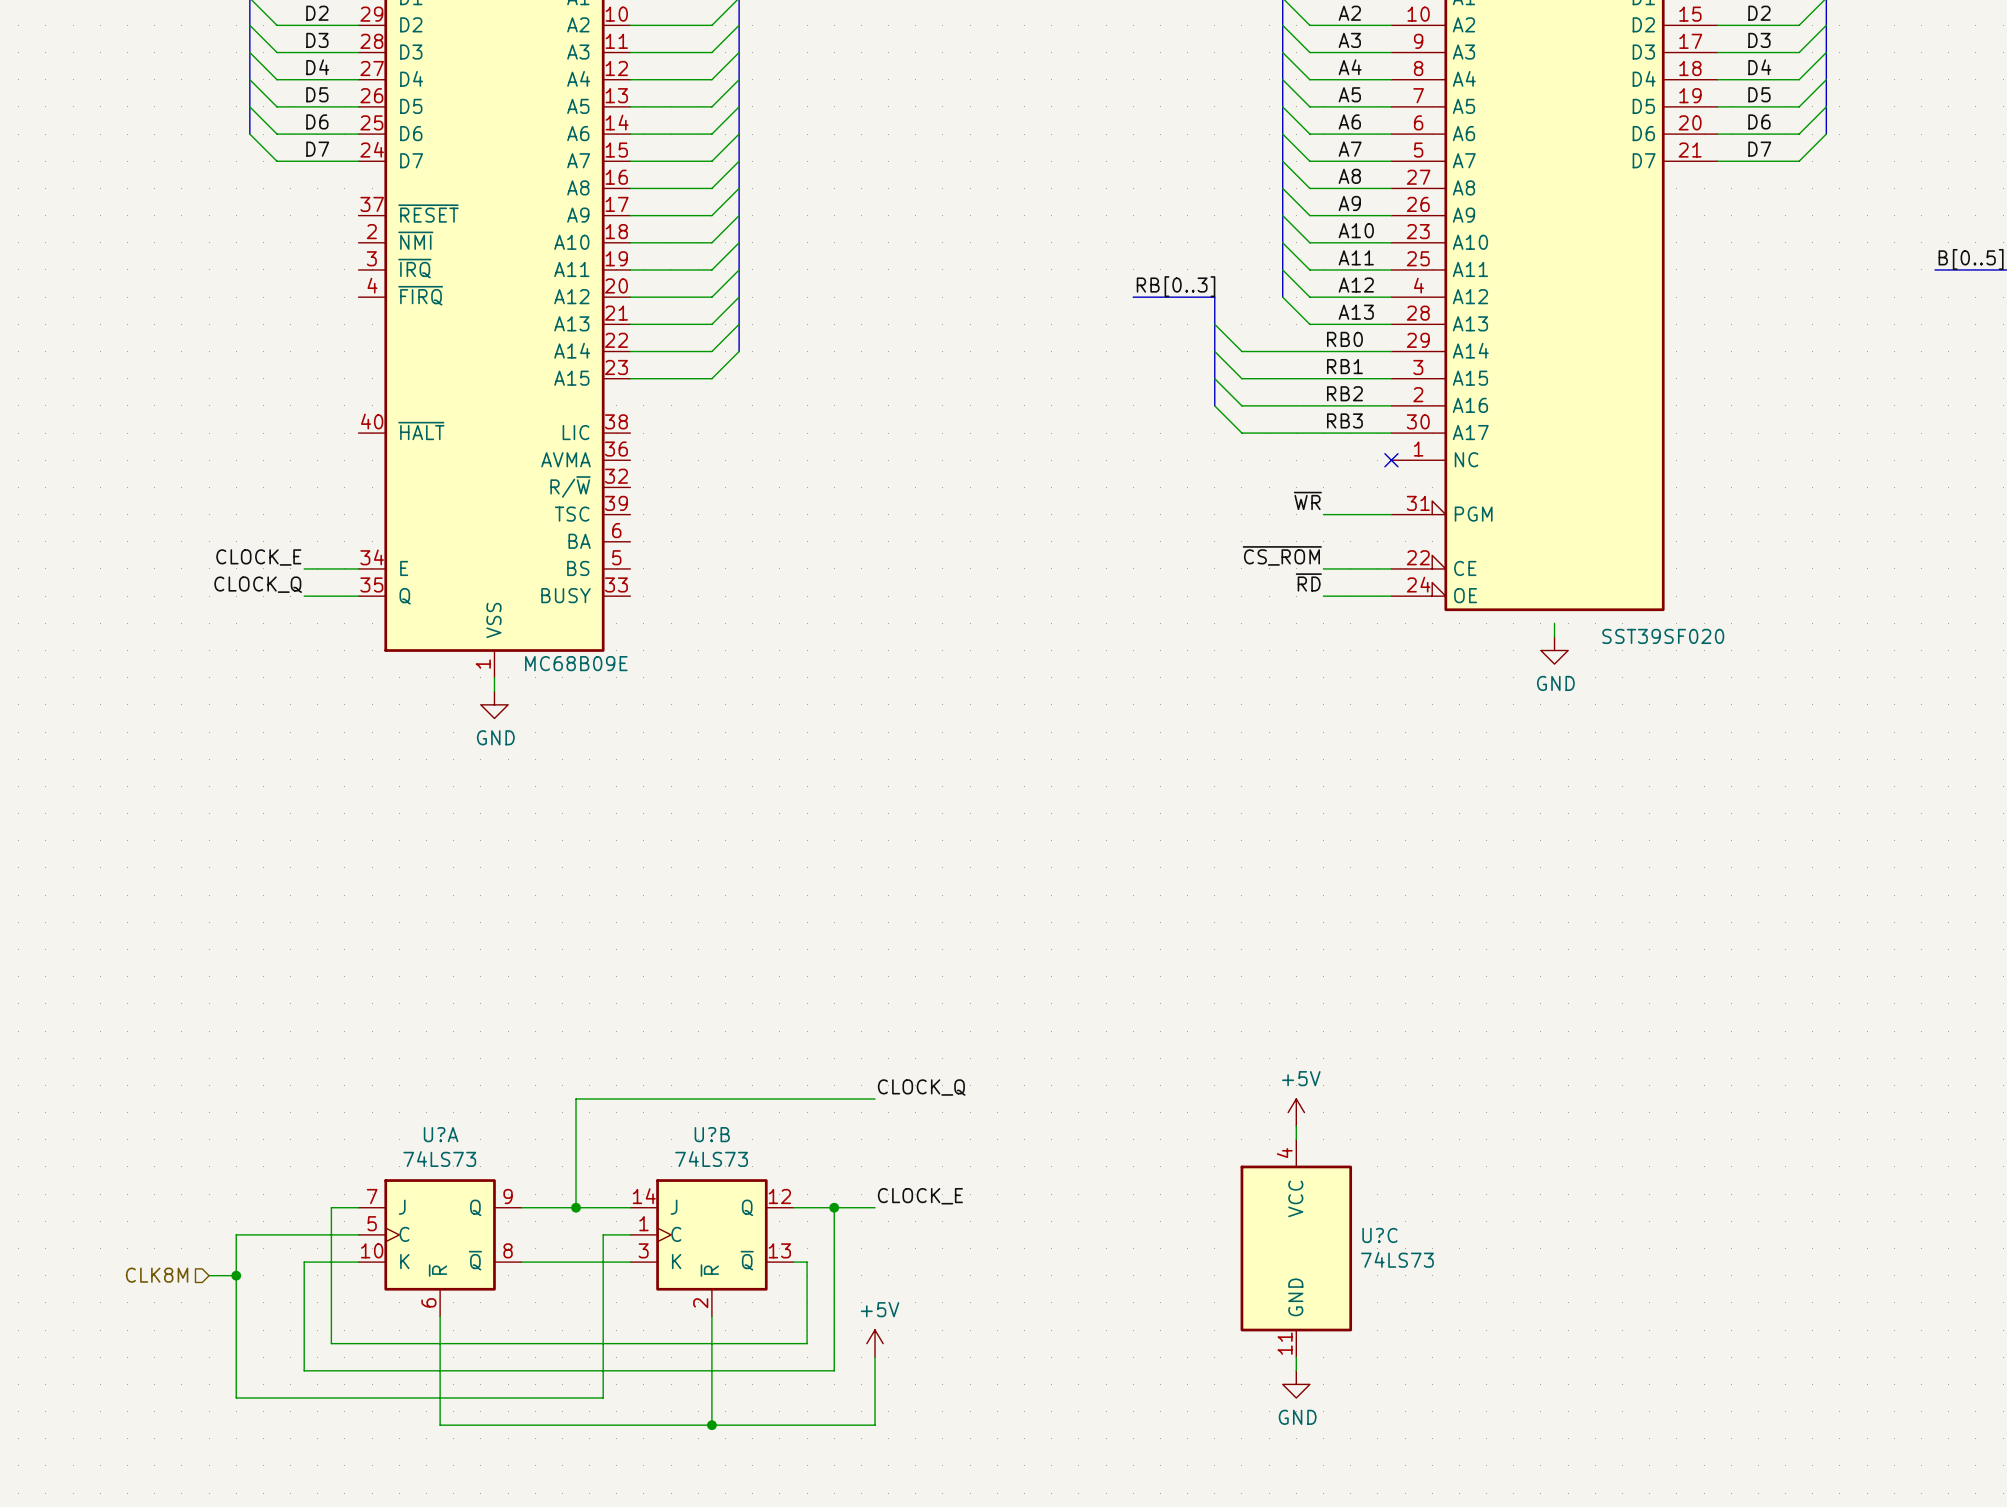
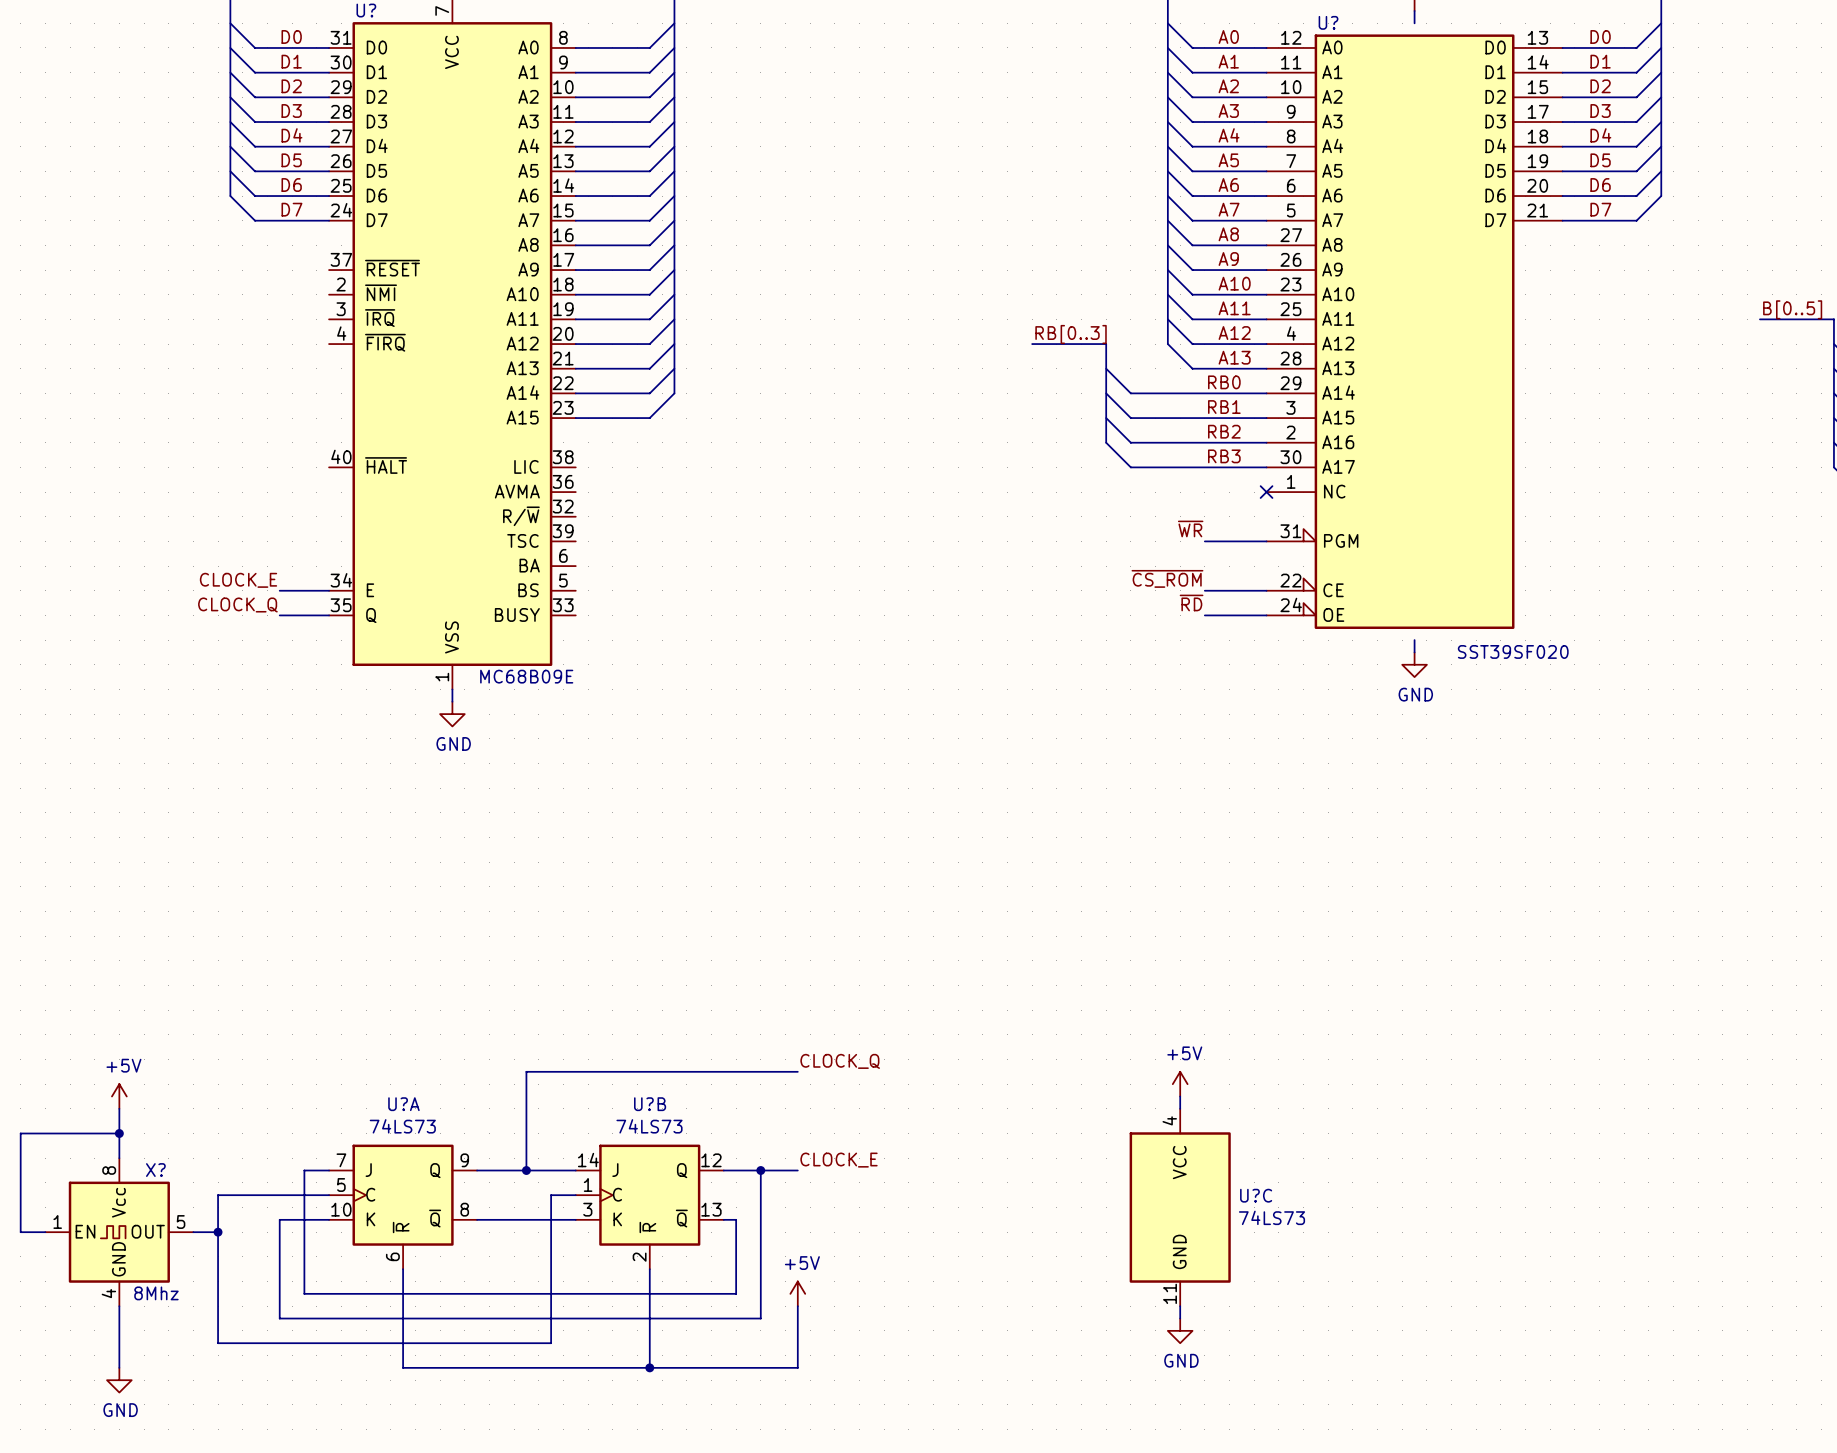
power symbol: none -> +5V (119, 1096)
wire: none -> (119, 1108) (119, 1158)
wire: none -> (119, 1133) (20, 1133) (20, 1232) (45, 1232)
junction: none -> (119, 1133)
X?: none -> 8Mhz (119, 1232)
hierarchical label: CLK8M (157, 1275) -> none
wire: none -> (119, 1306) (119, 1367)
power symbol: none -> GND (119, 1380)

